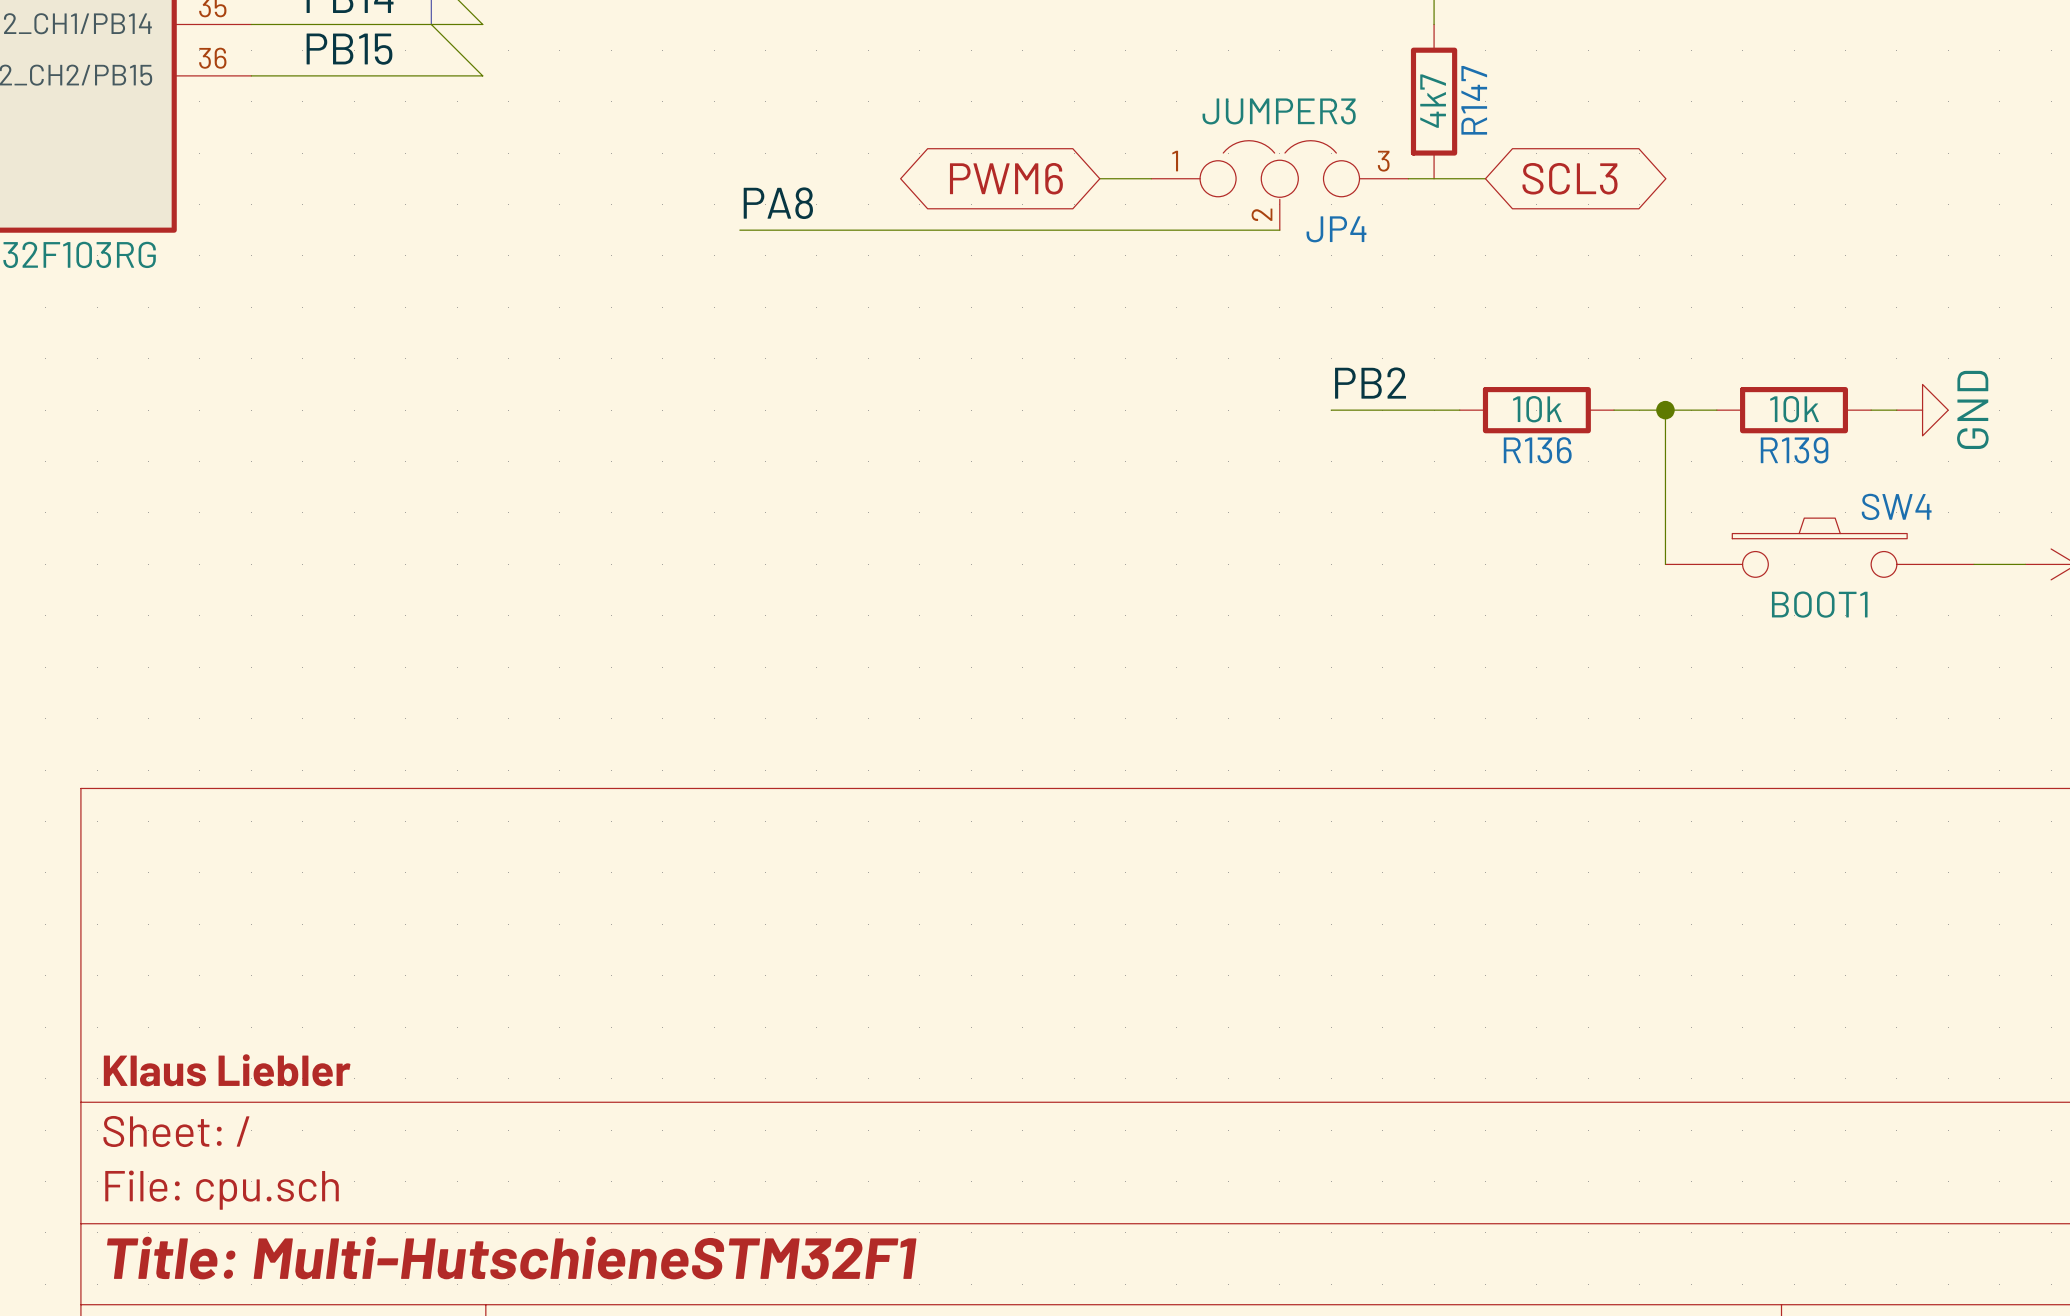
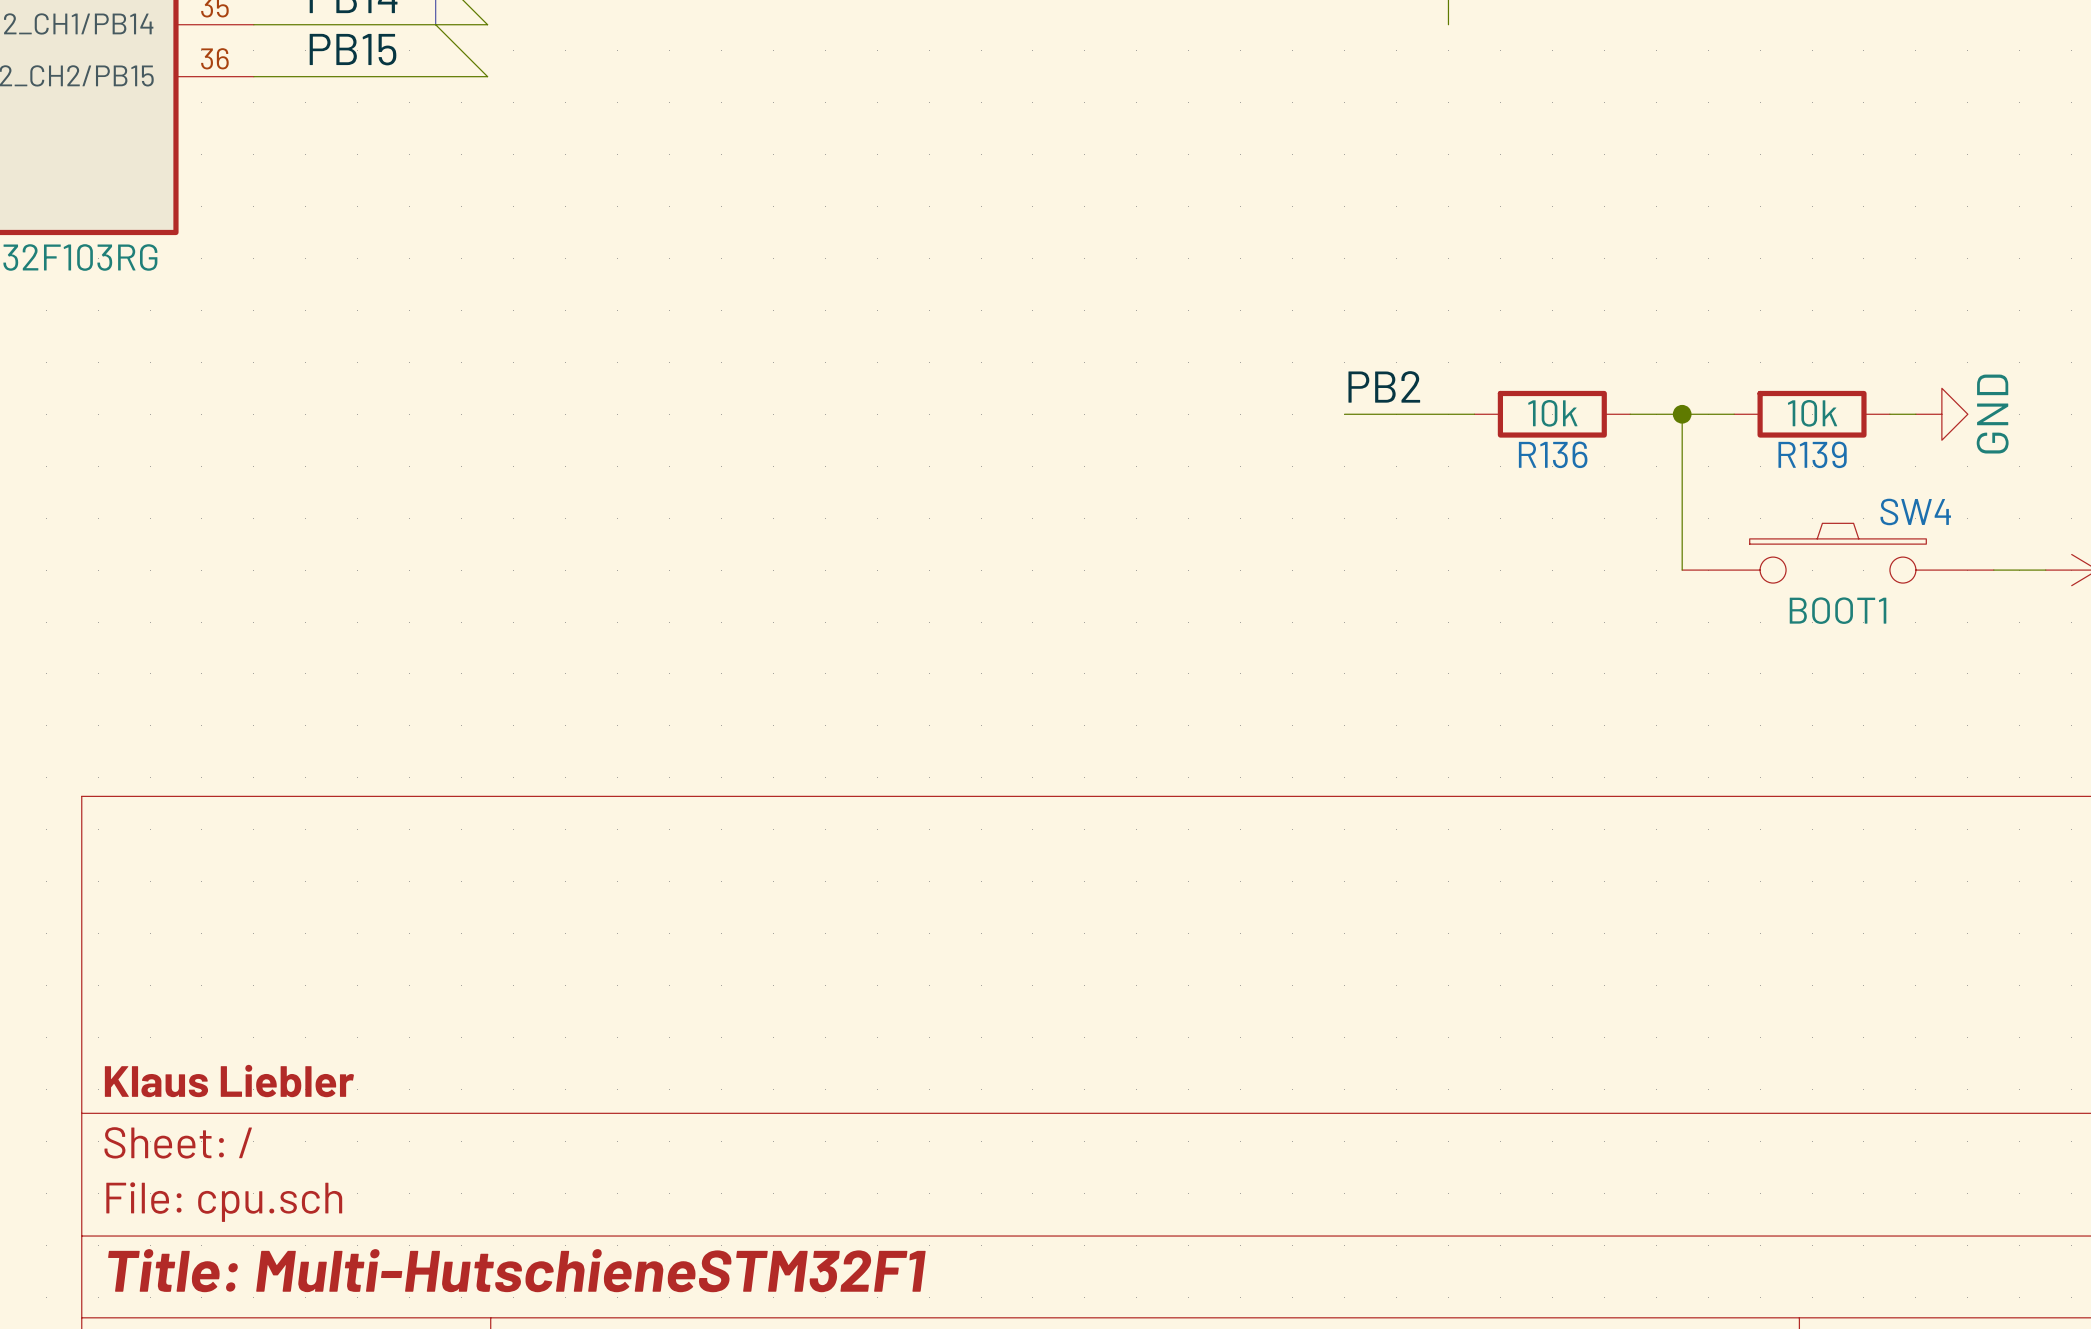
R147: 4k7 (1434, 101) -> none
global label: PWM6 (1006, 178) -> none
wire: (1099, 178) (1151, 178) -> none
wire: (1408, 178) (1485, 178) -> none
global label: SCL3 (1570, 178) -> none
JP4: JUMPER3 (1279, 185) -> none
label: PA8 (778, 203) -> none
wire: (739, 230) (1279, 230) -> none

